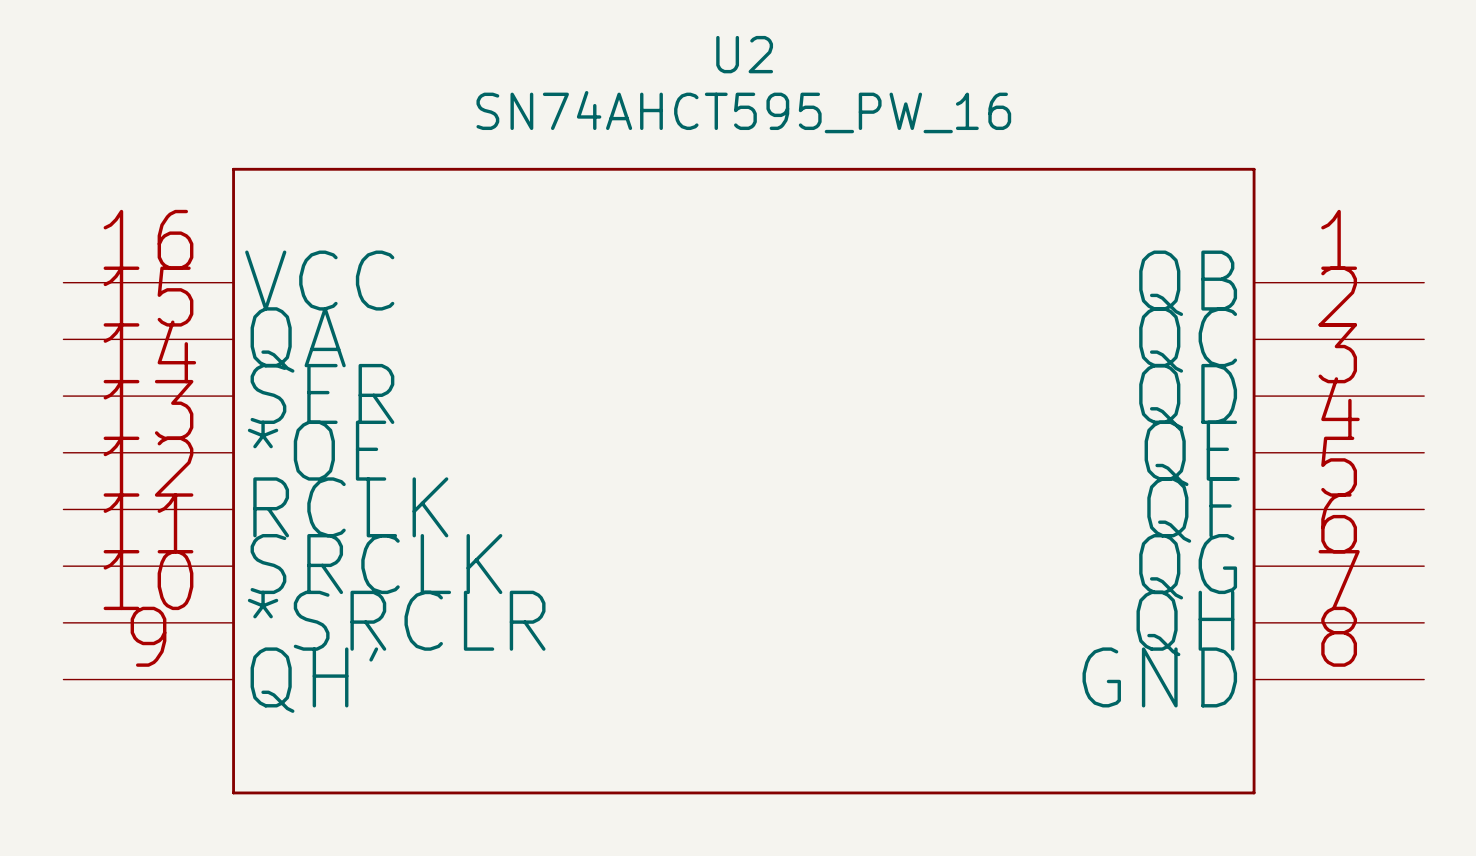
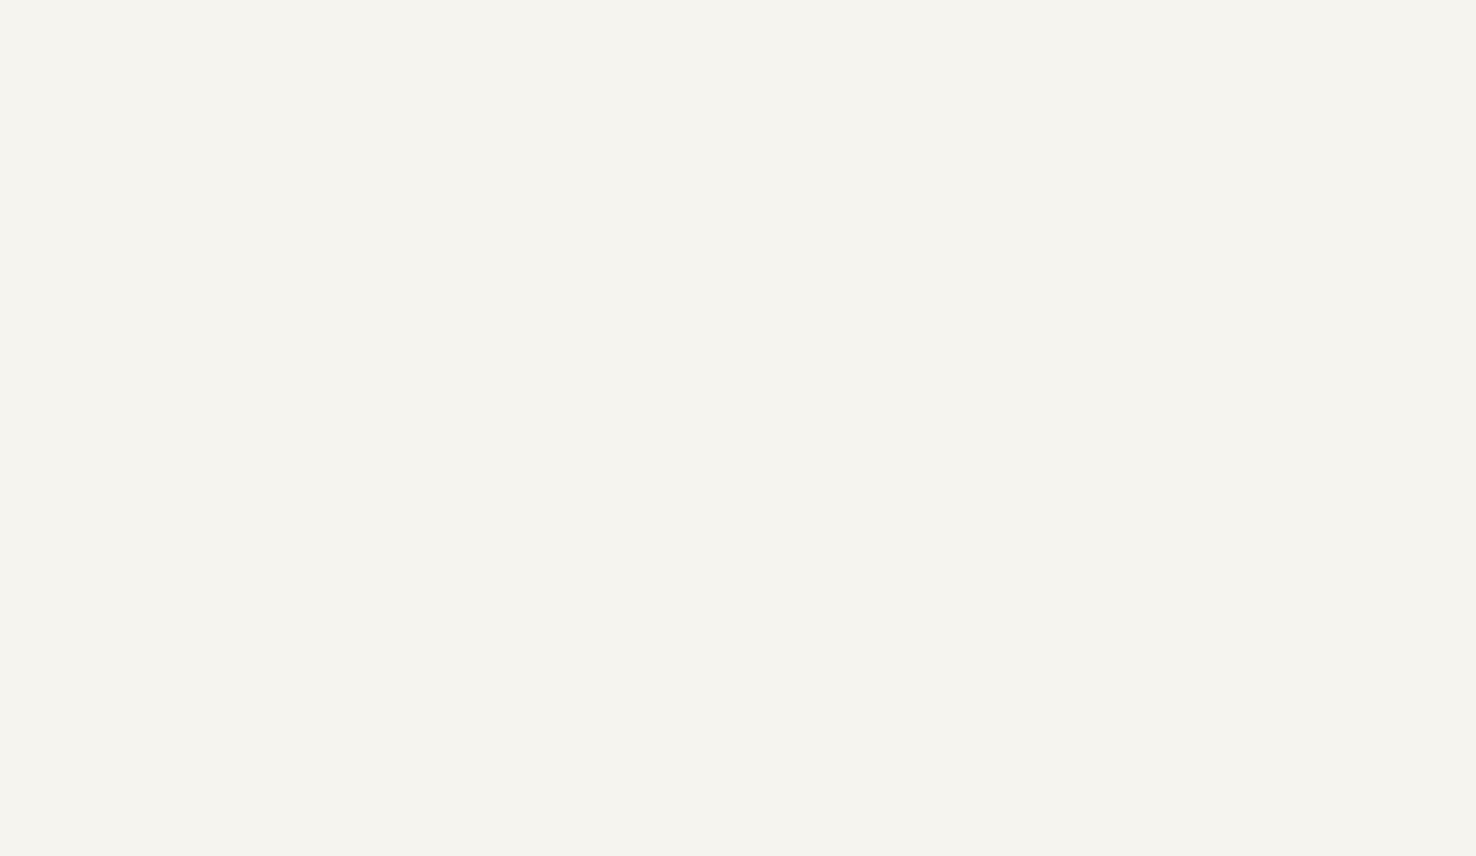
U2: SN74AHCT595_PW_16 (743, 481) -> none

